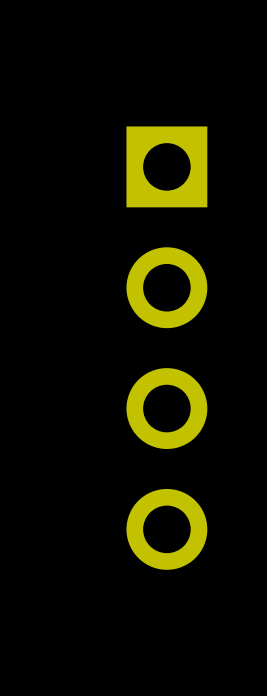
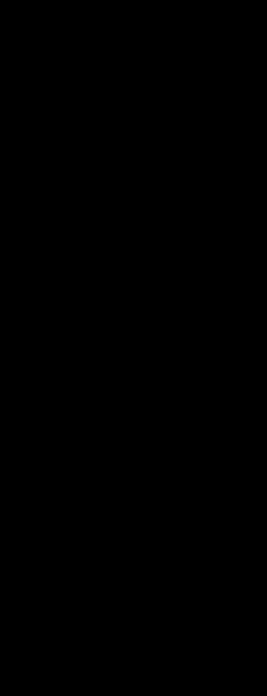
part: (166, 348) -> none

